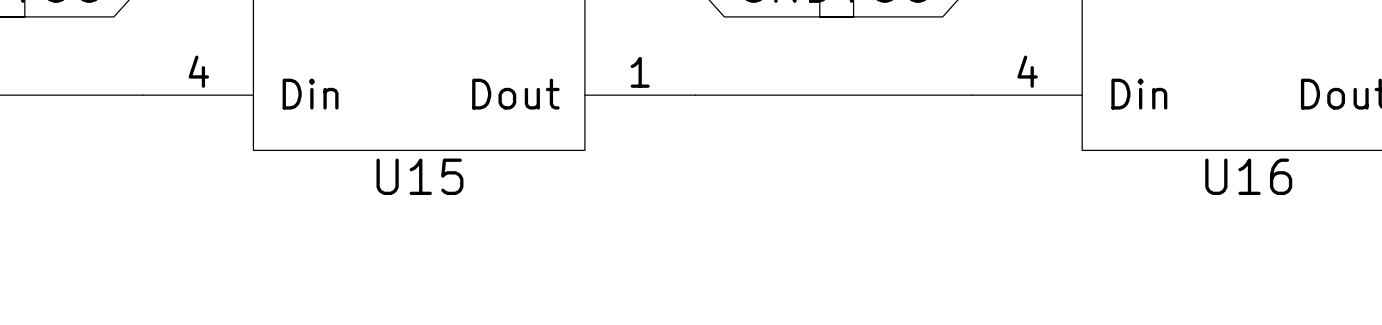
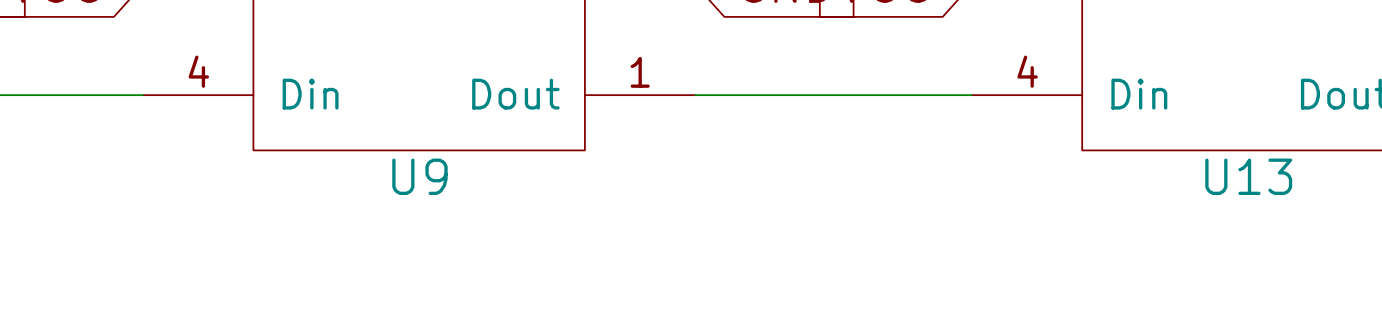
U15 name: U15 (419, 176) -> U9 (419, 176)
U16 name: U16 (1248, 176) -> U13 (1248, 176)

